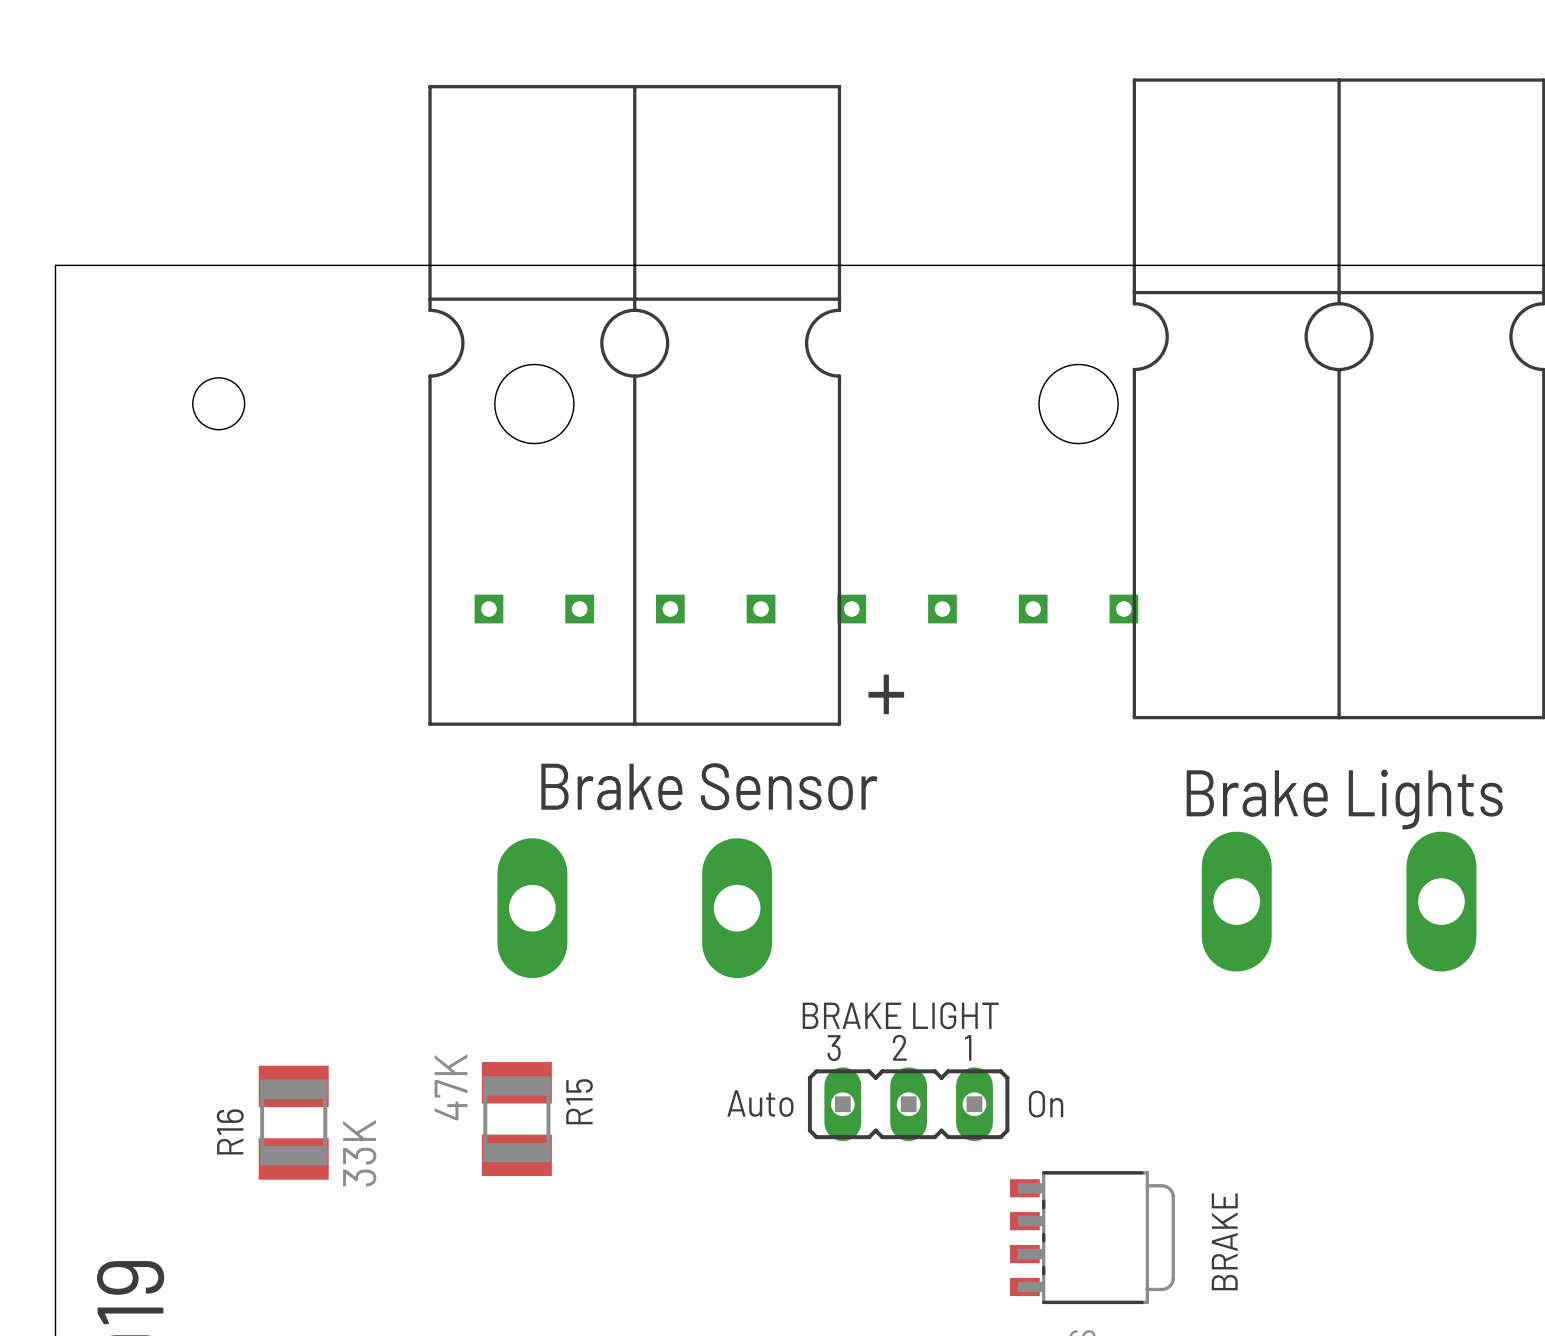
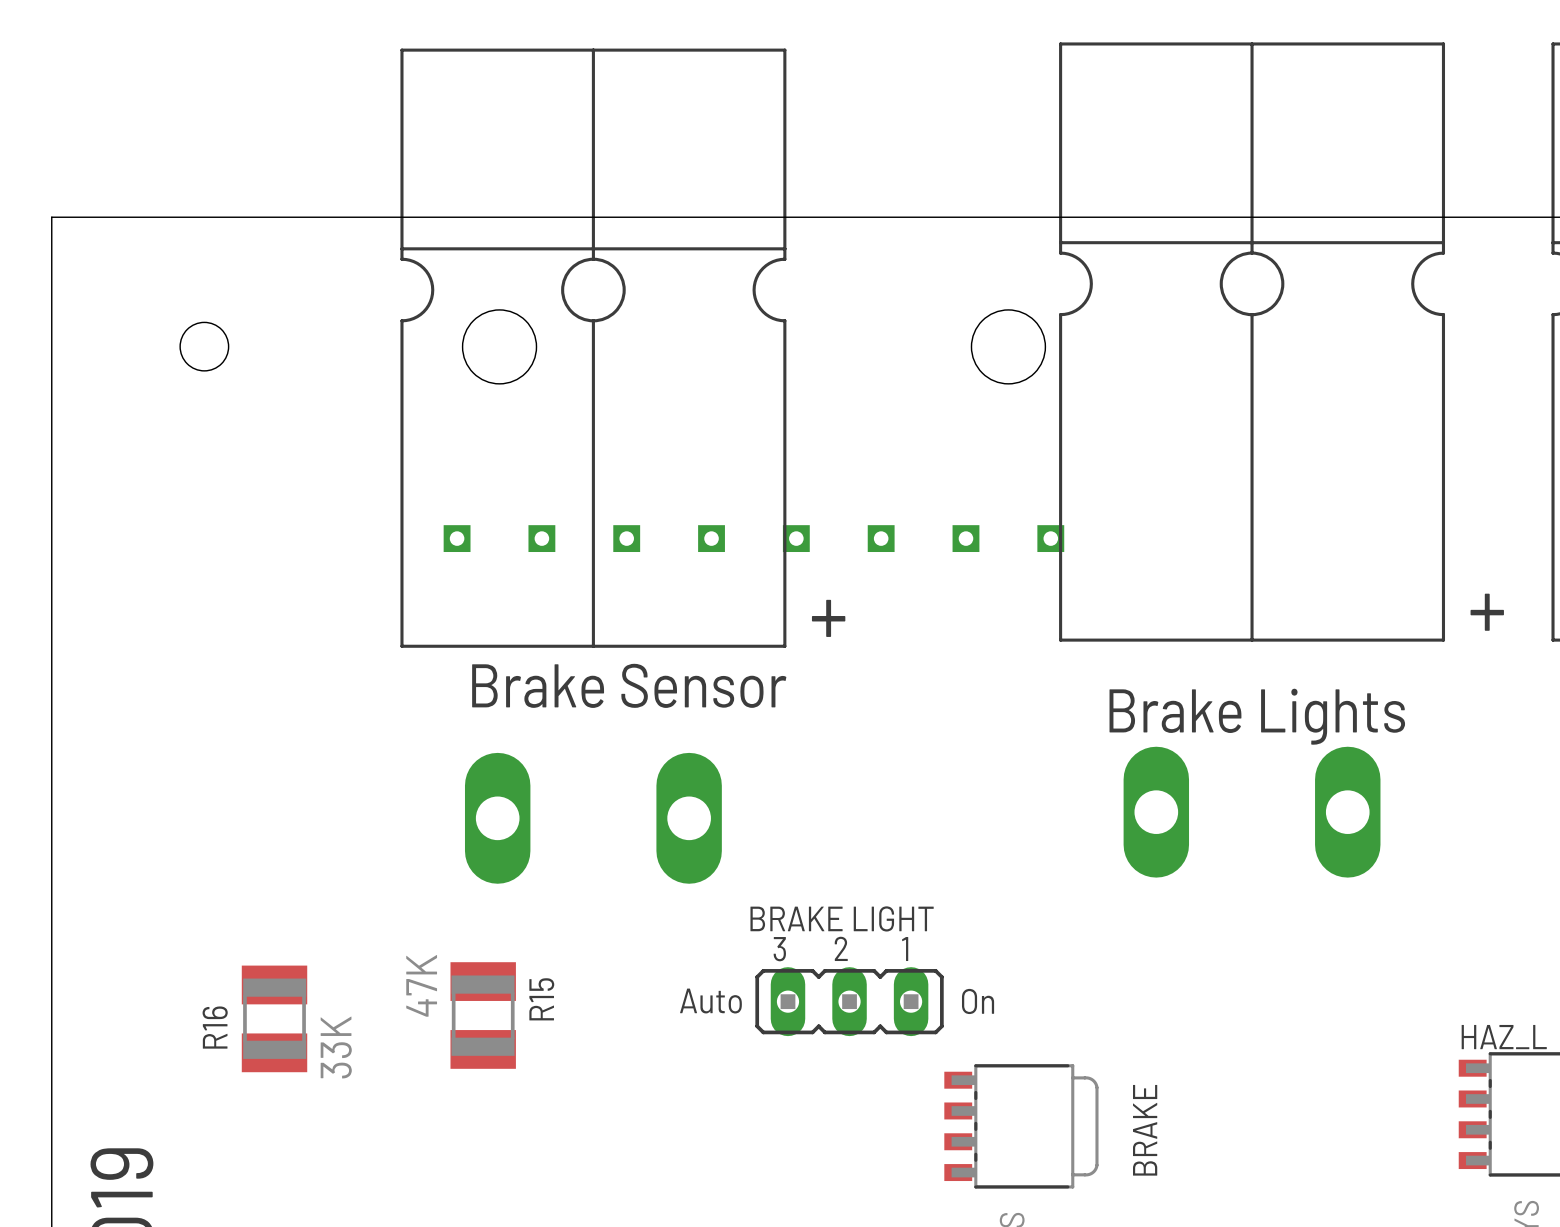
text position: Brake Sensor (709, 786) -> Brake Sensor (629, 685)

